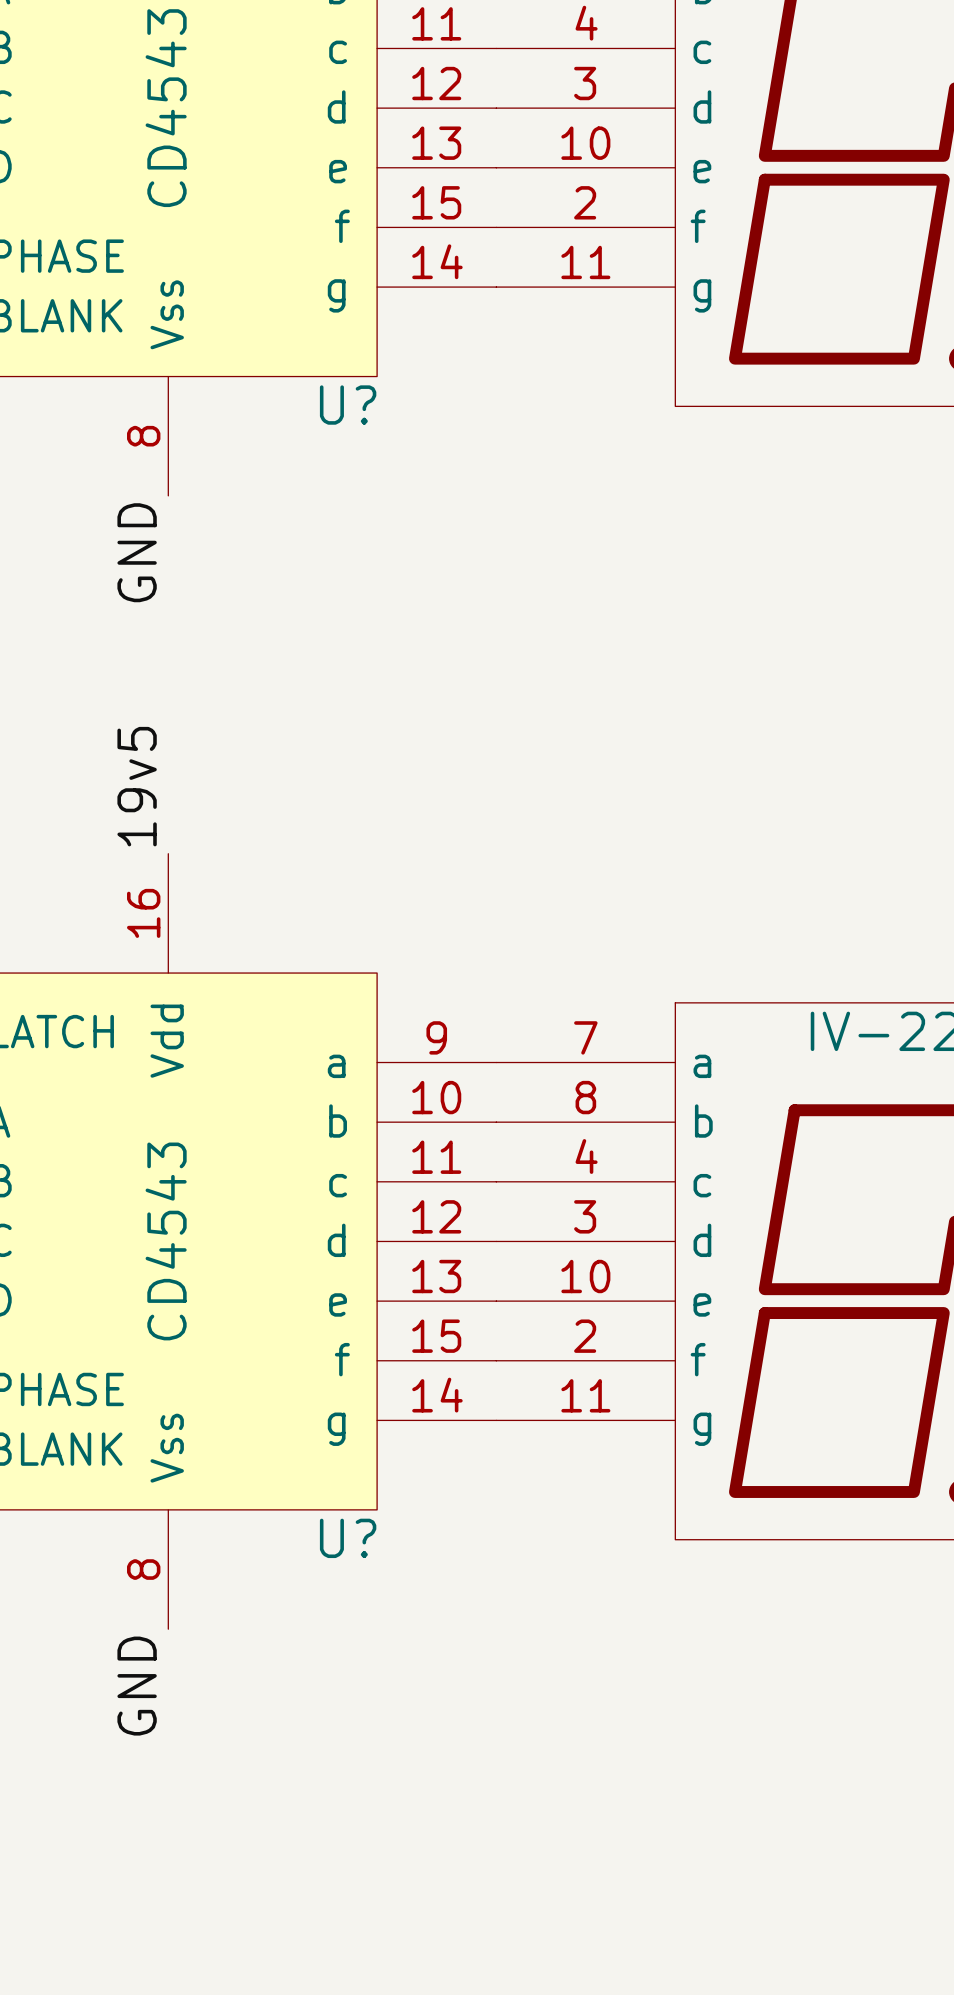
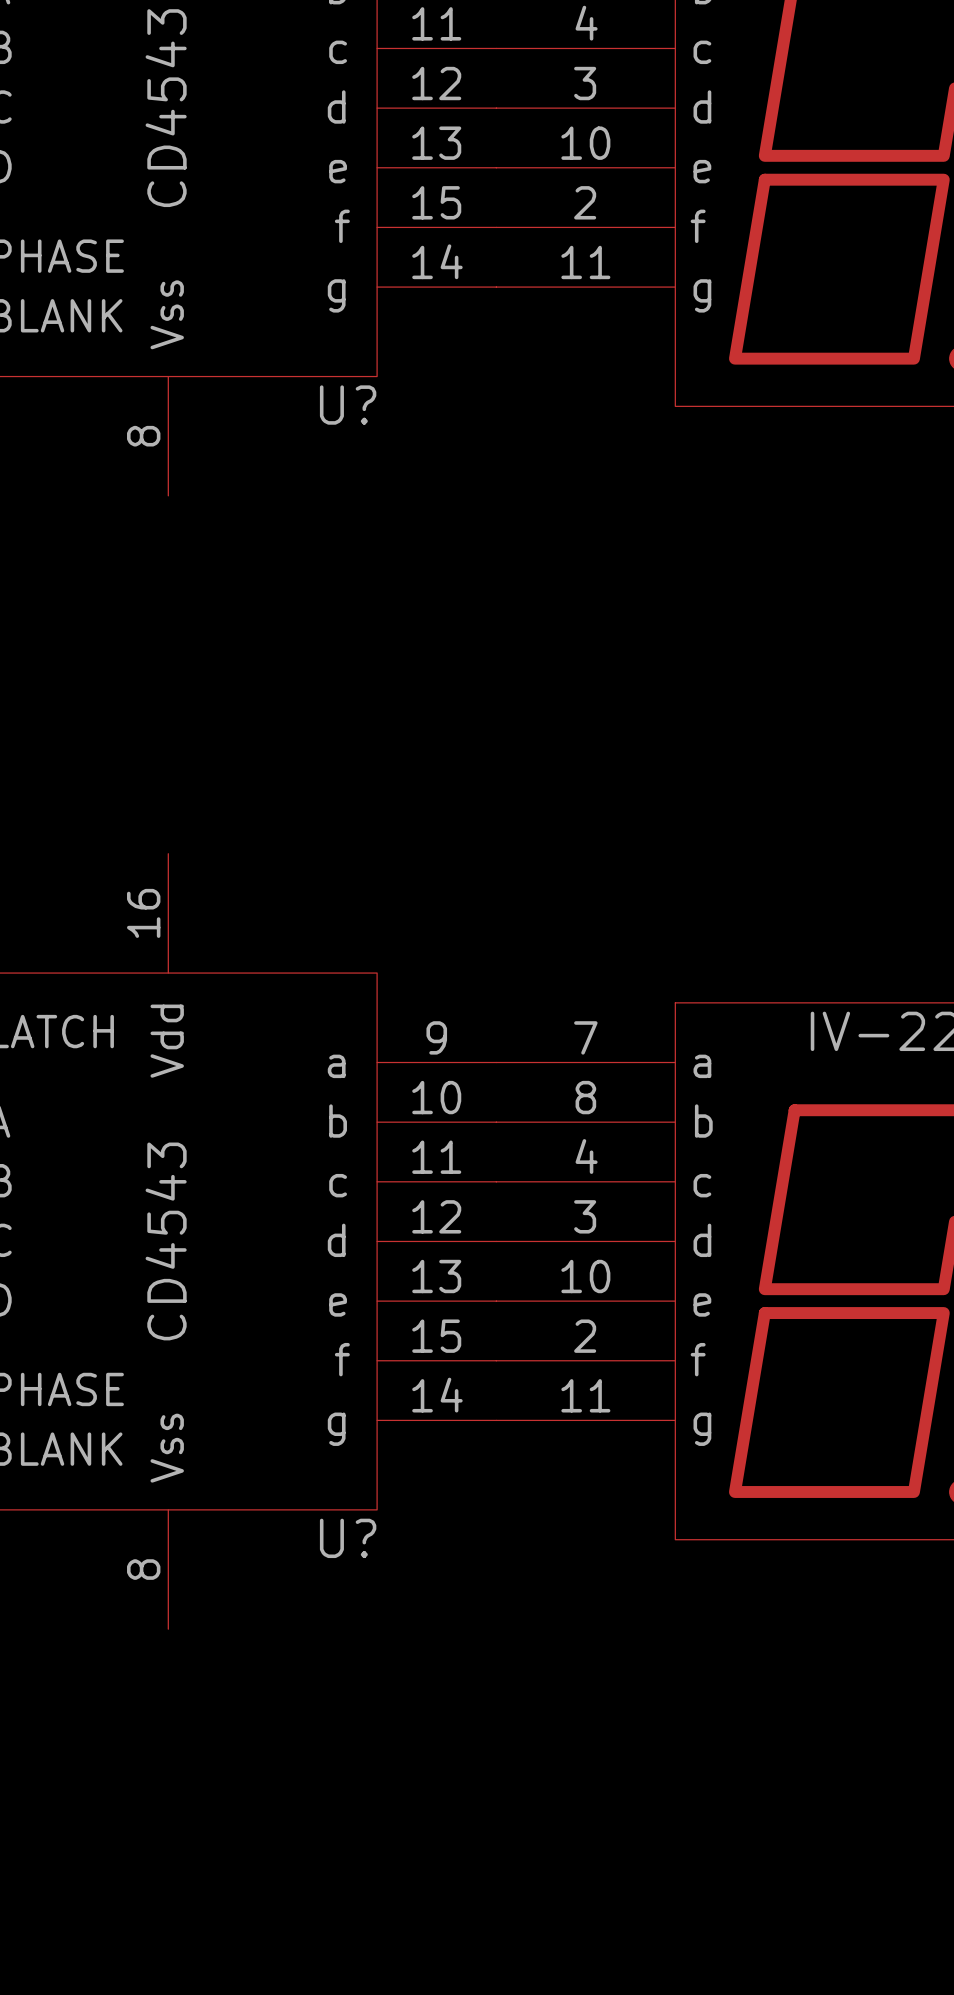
label: GND (137, 552) -> none
label: 19v5 (137, 786) -> none
label: GND (137, 1686) -> none

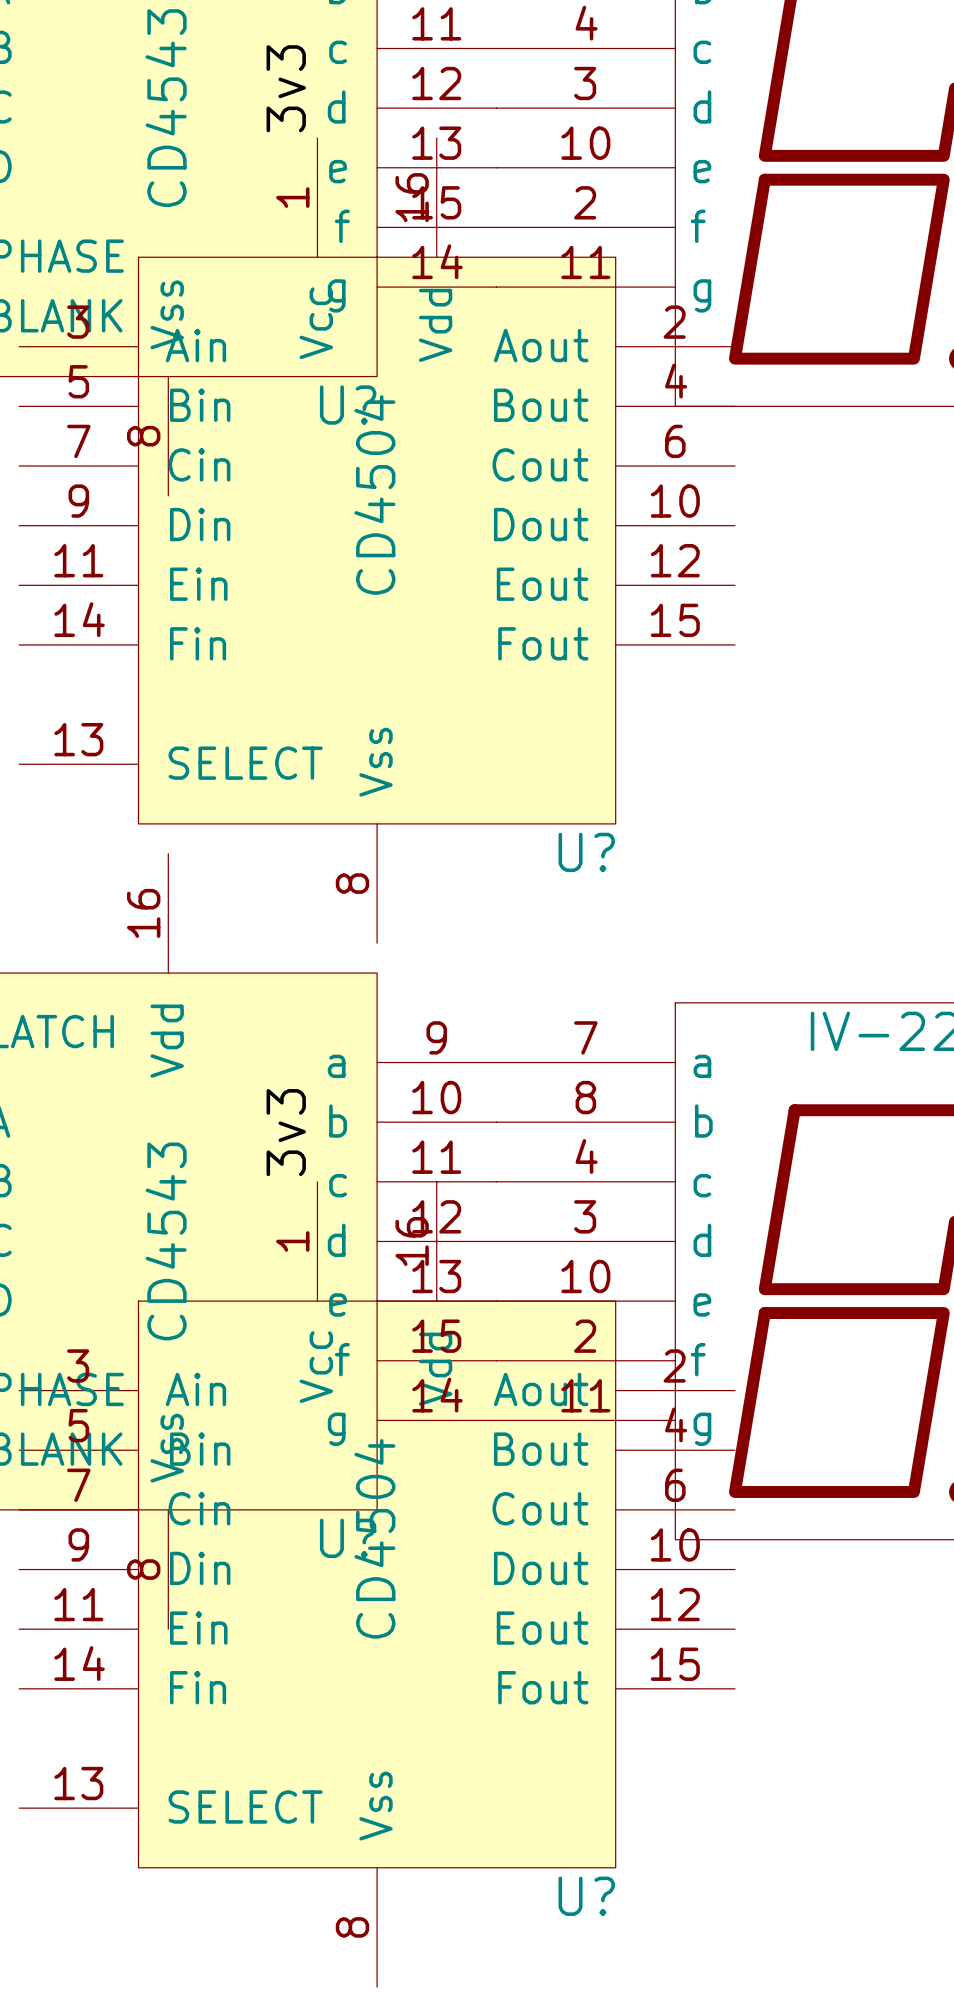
label: none -> 3v3 (286, 88)
U?: none -> CD4504 (377, 540)
label: none -> 3v3 (286, 1132)
U?: none -> CD4504 (377, 1584)

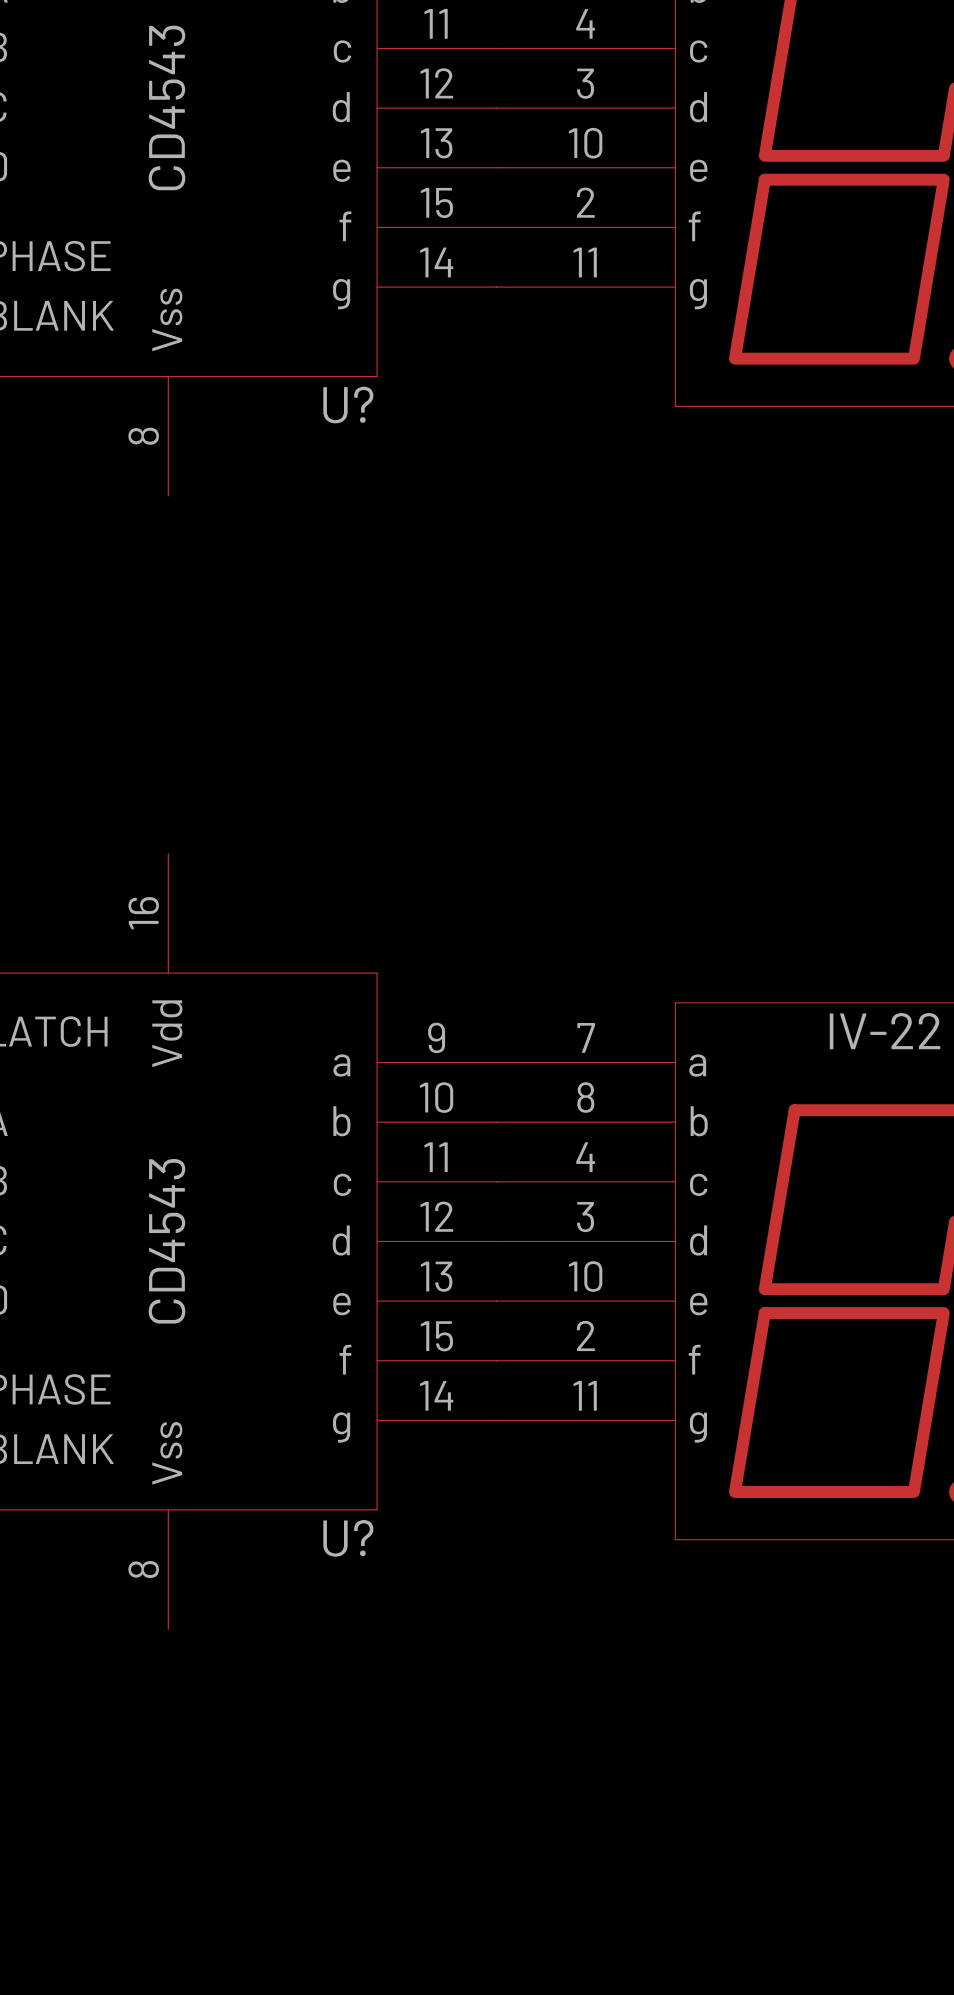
label: 3v3 (286, 88) -> none
U?: CD4504 (377, 540) -> none
label: 3v3 (286, 1132) -> none
U?: CD4504 (377, 1584) -> none

